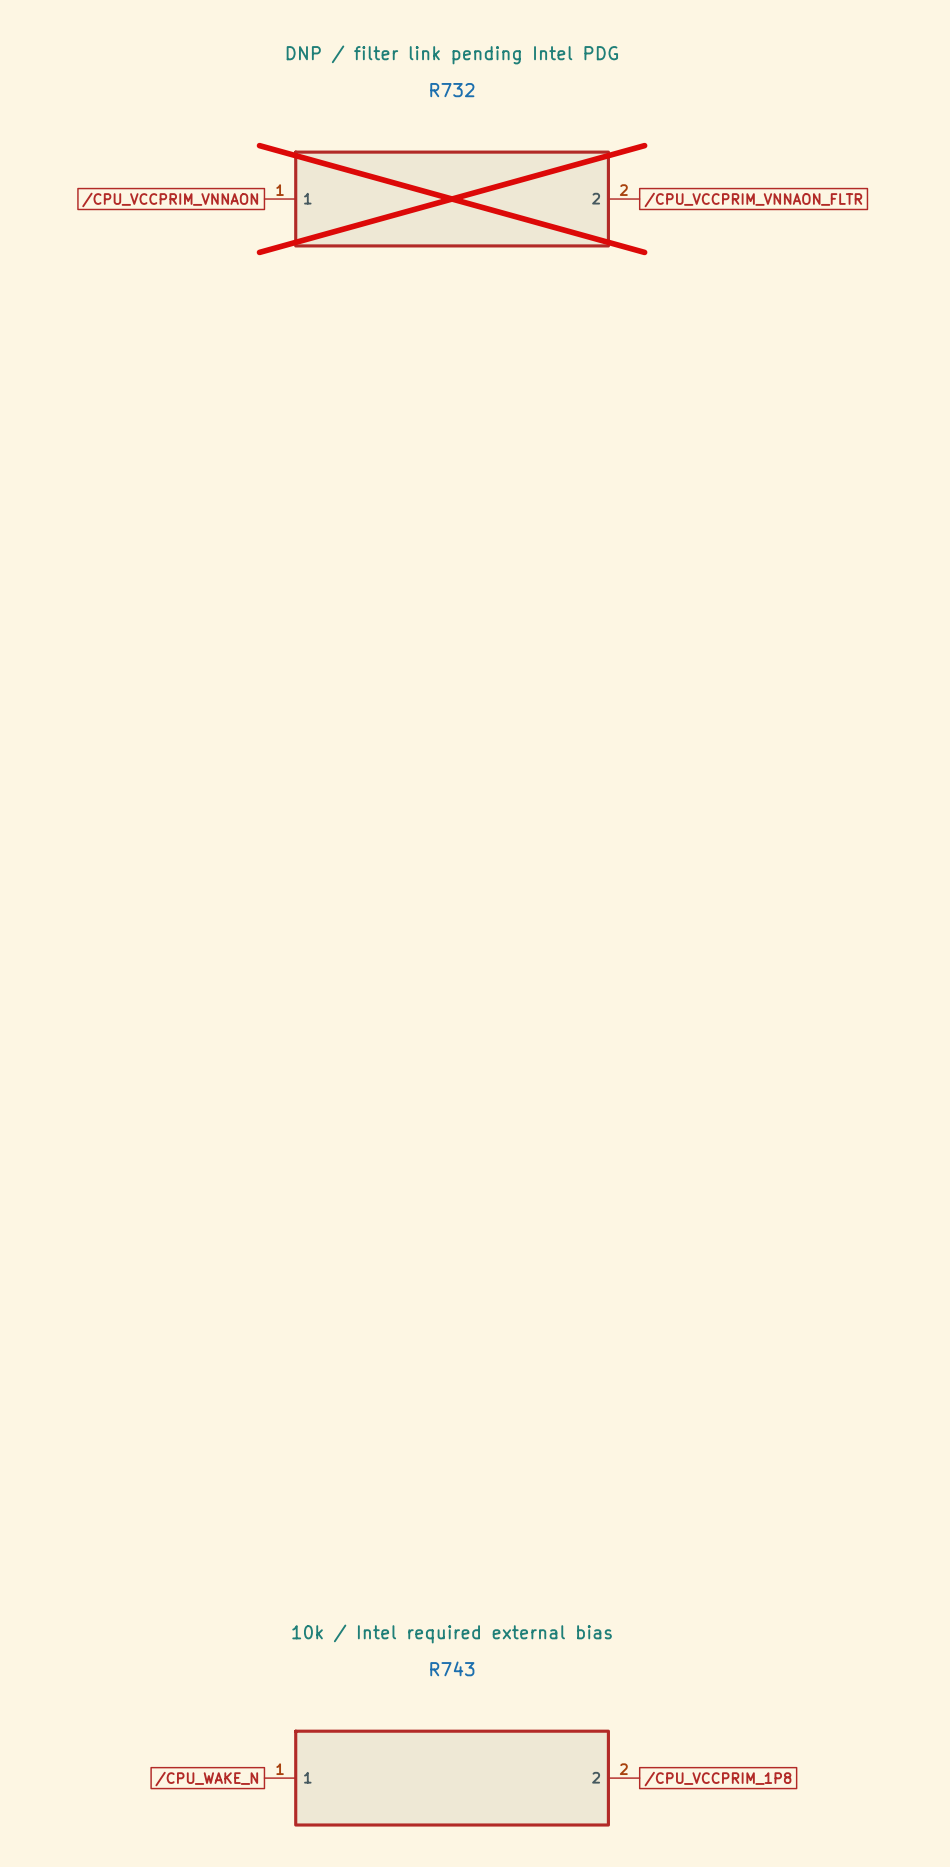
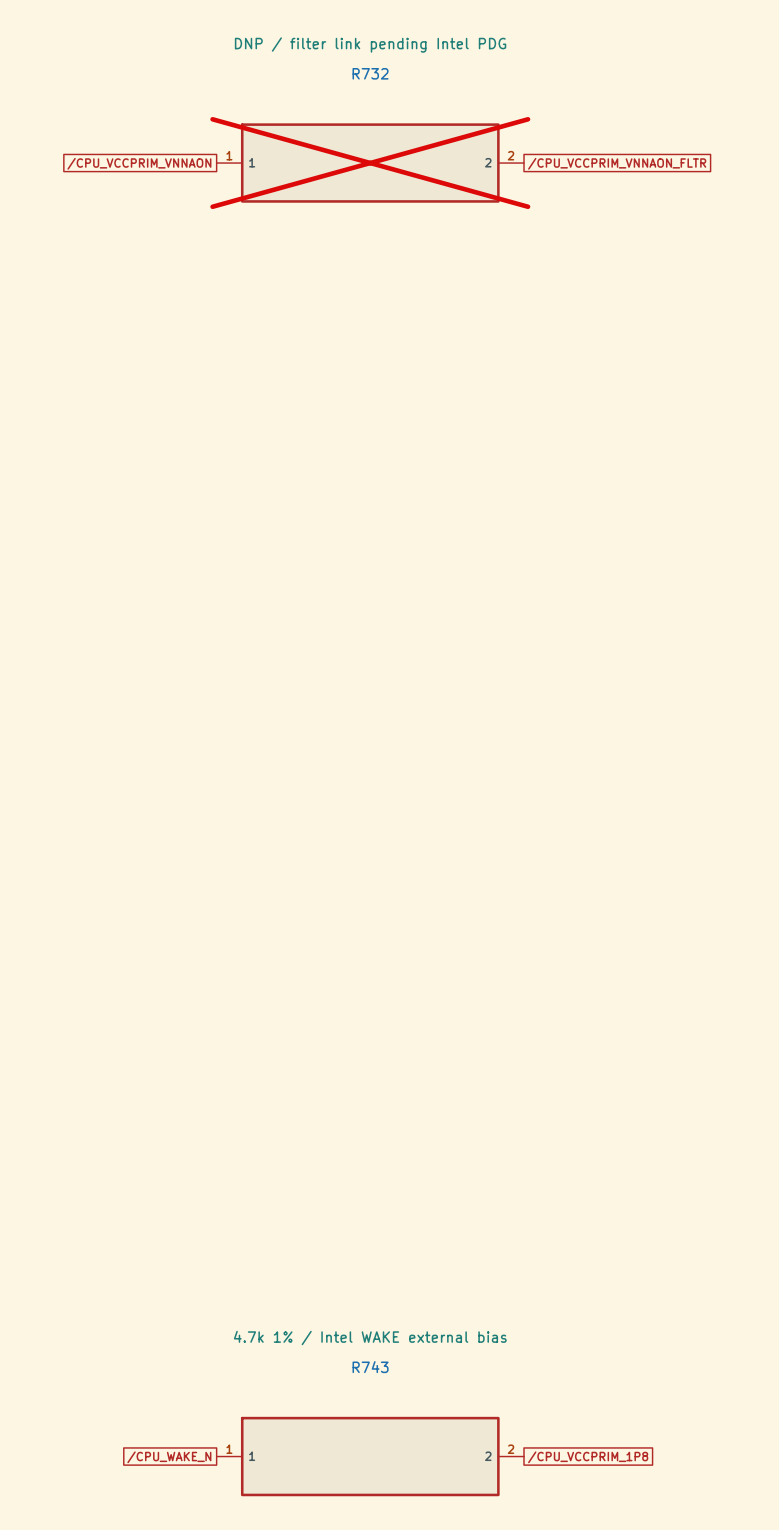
R743 value: 10k / Intel required external bias (452, 1634) -> 4.7k 1% / Intel WAKE external bias (370, 1338)

